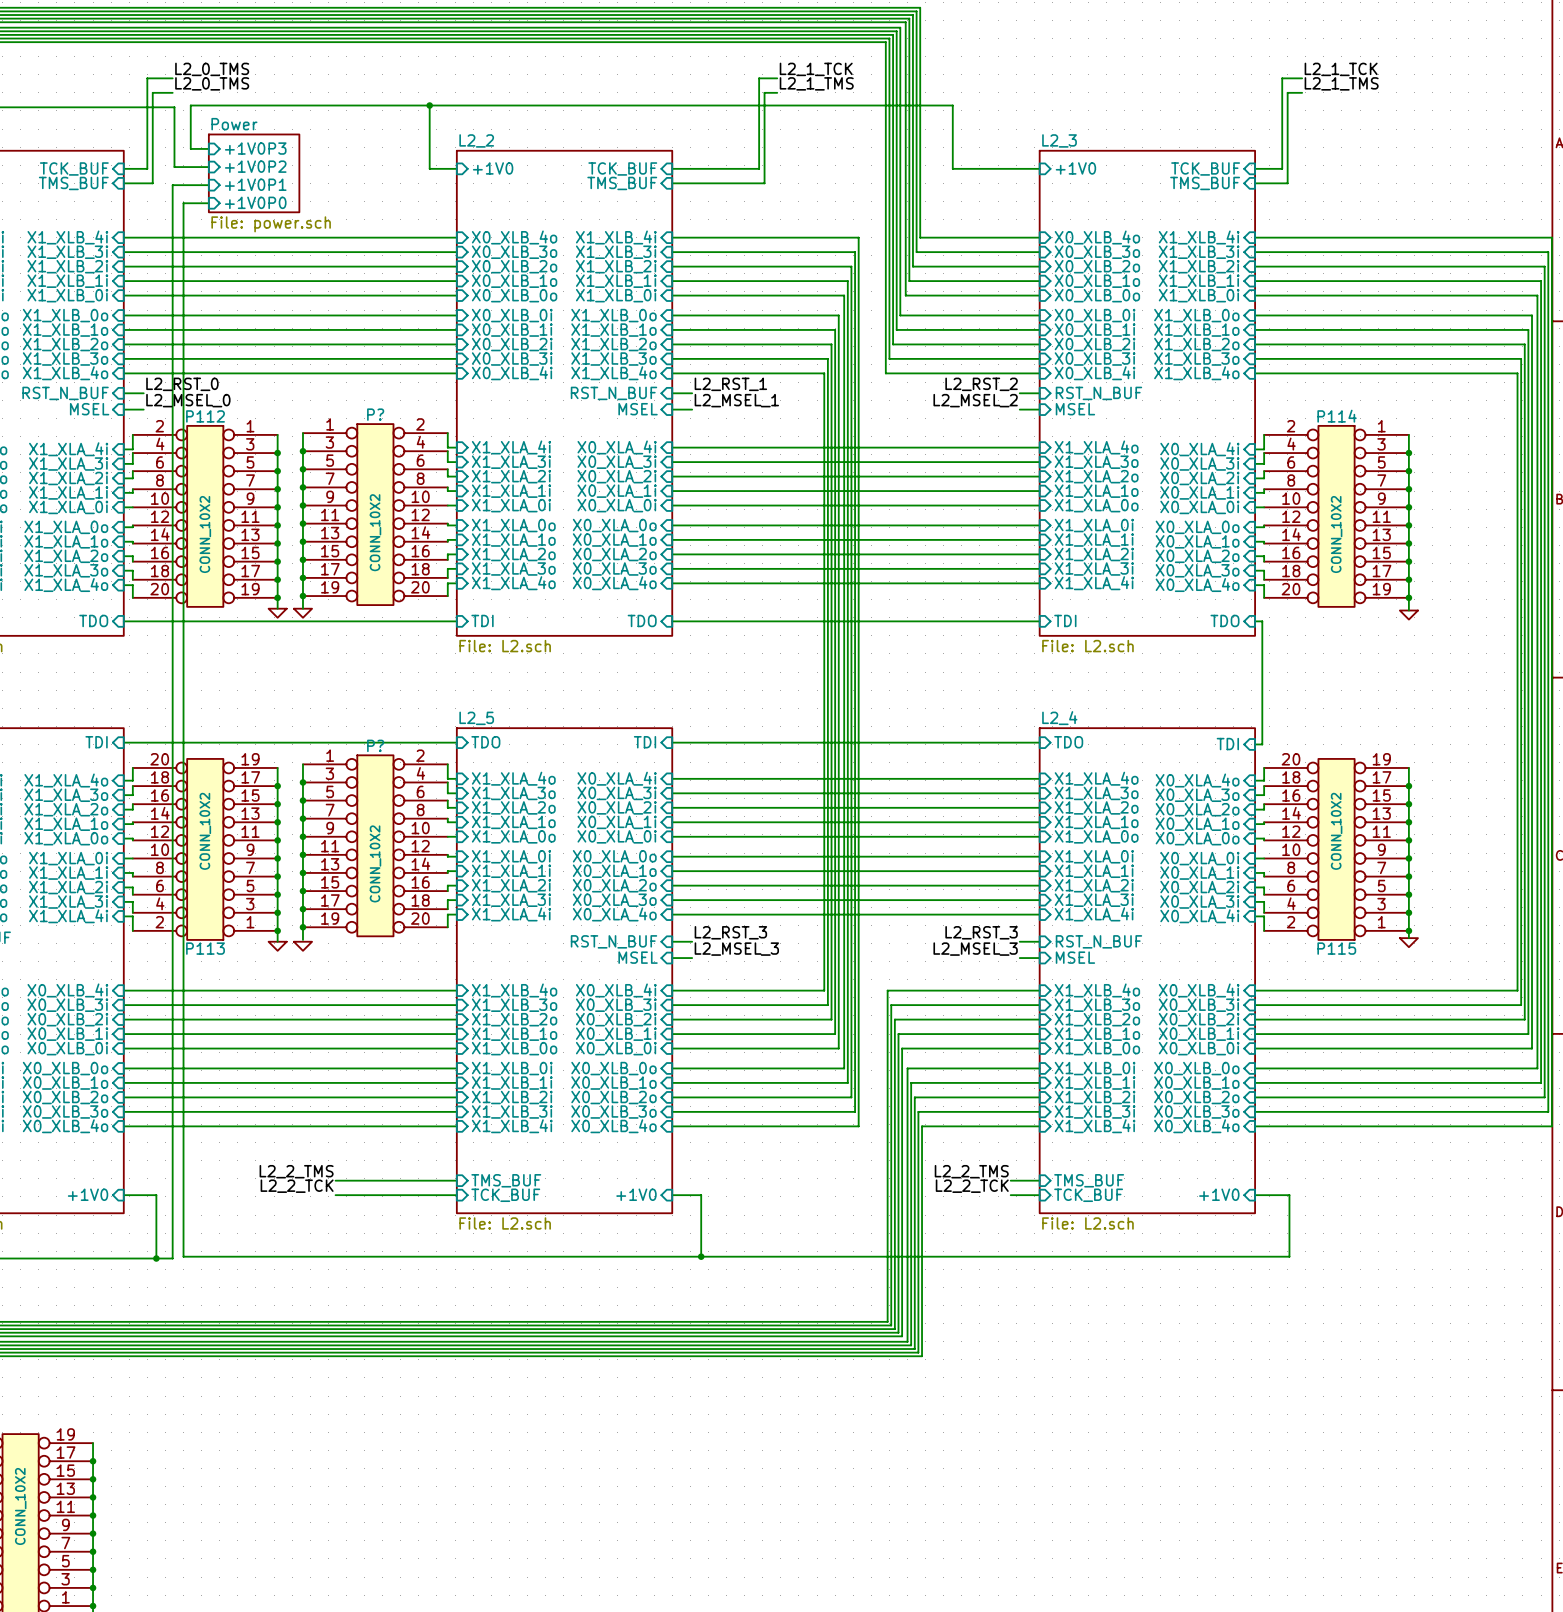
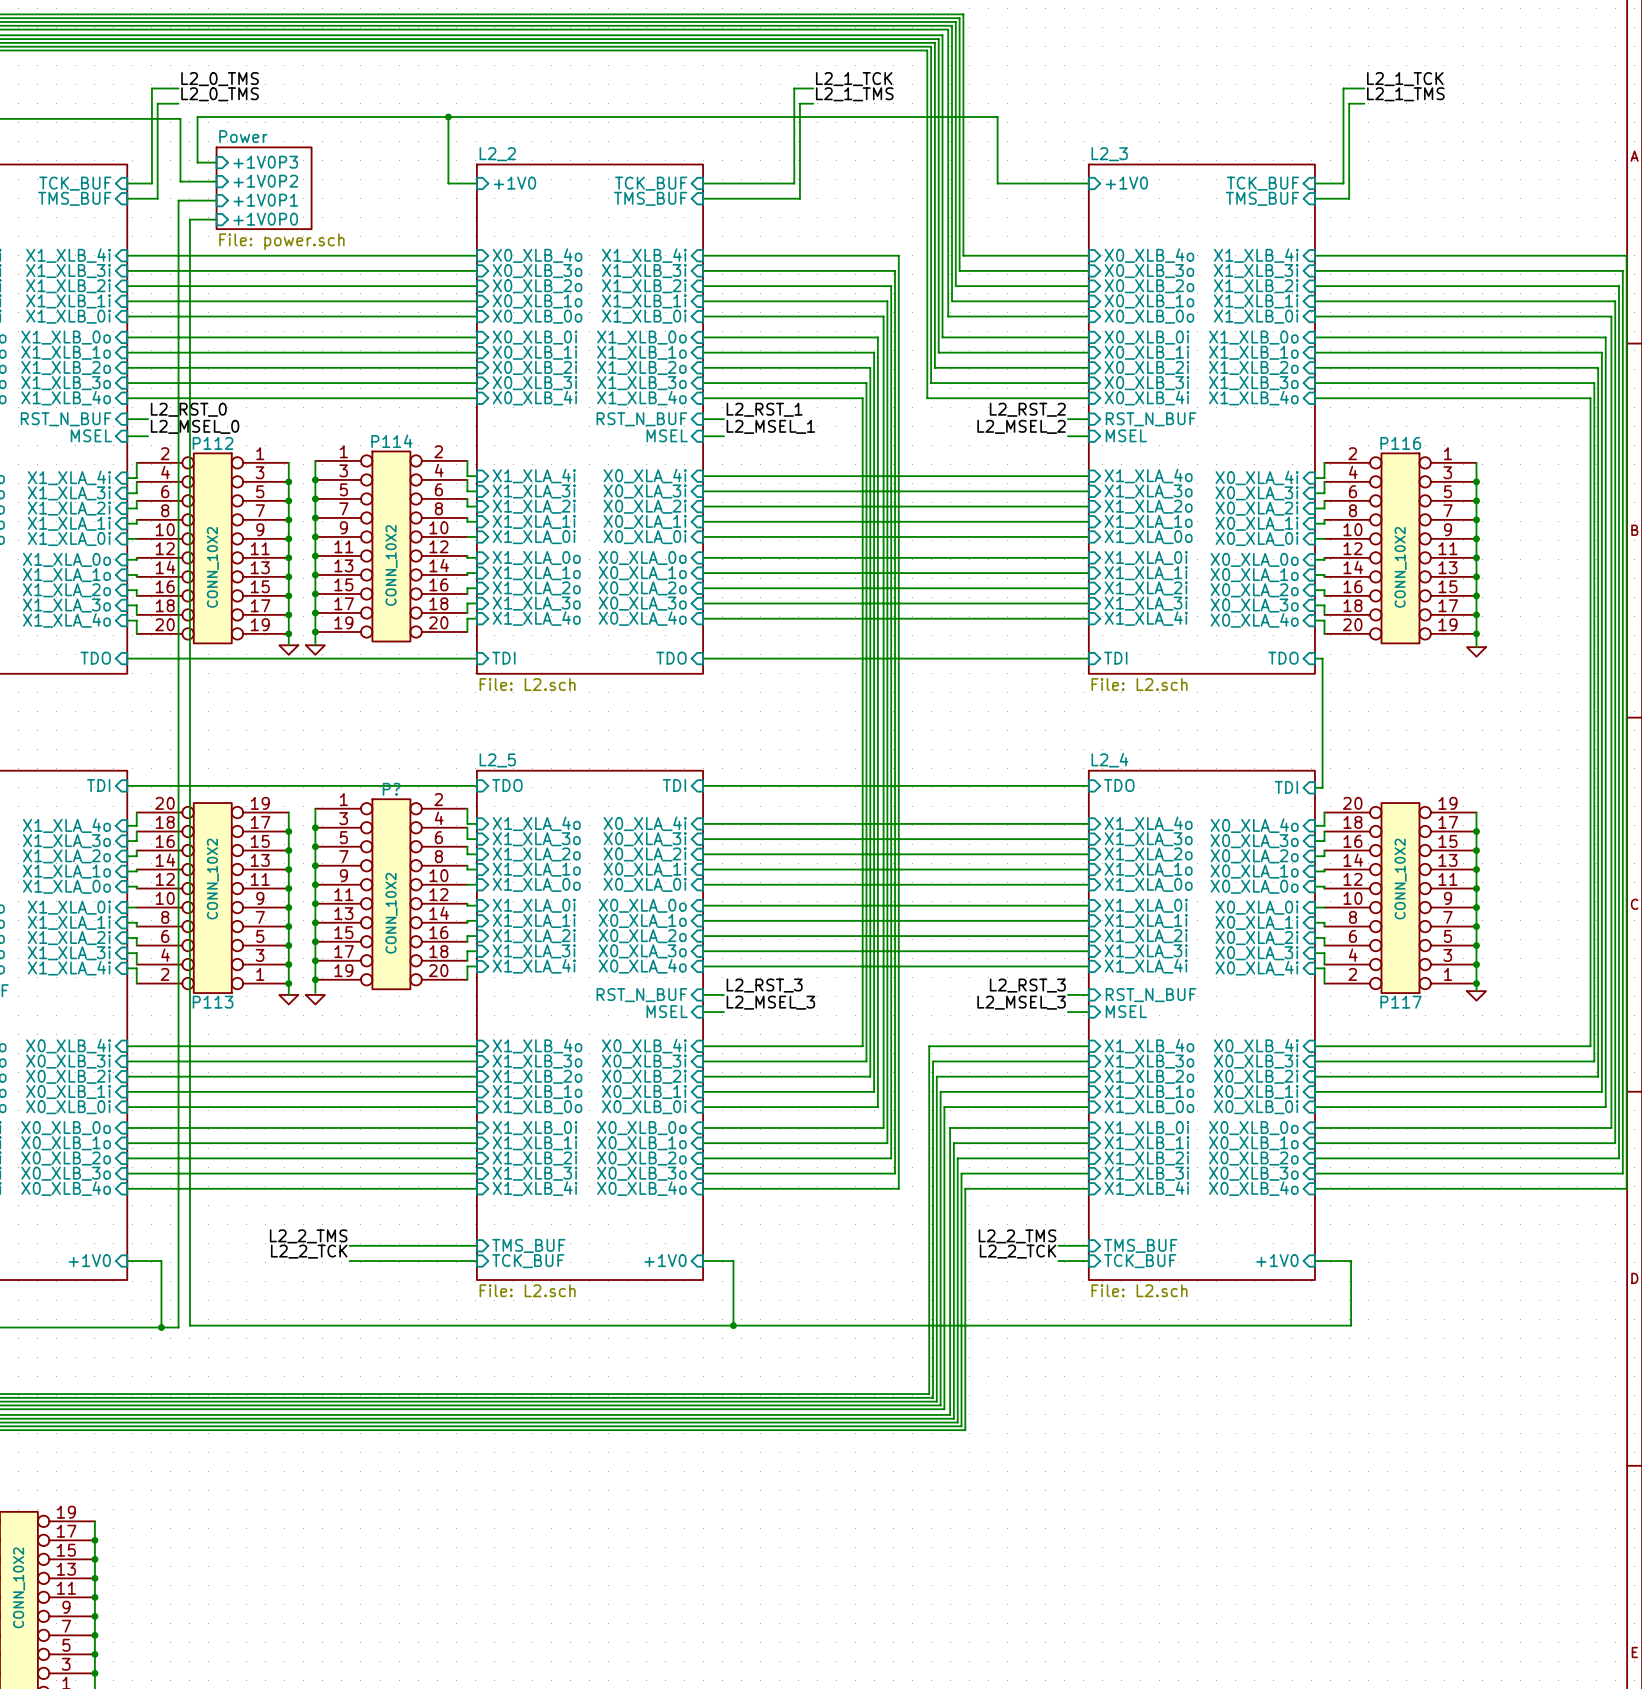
P? name: P? (375, 414) -> P114 (391, 441)
P114 name: P114 (1337, 416) -> P116 (1400, 443)
P115 name: P115 (1336, 948) -> P117 (1401, 1002)

